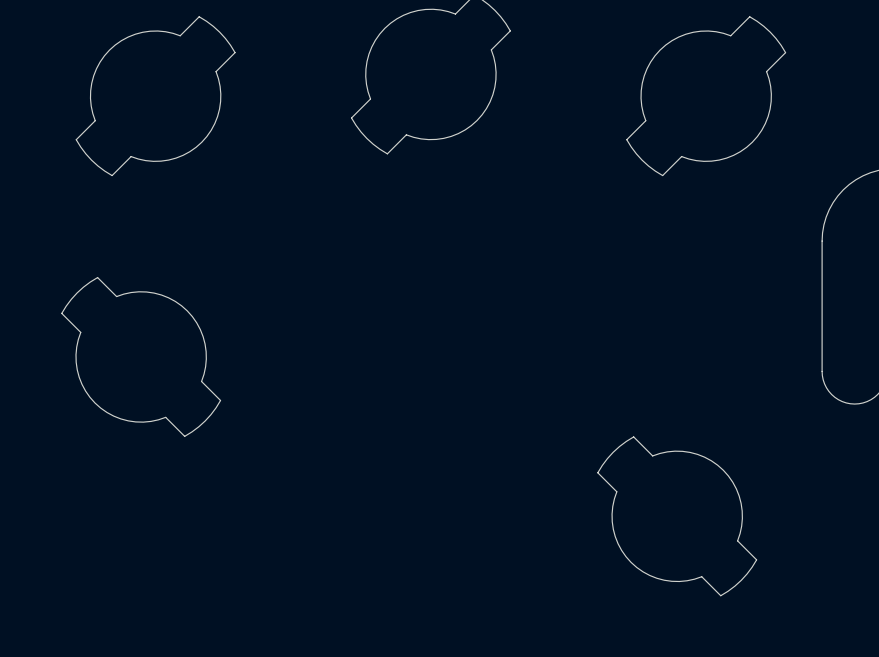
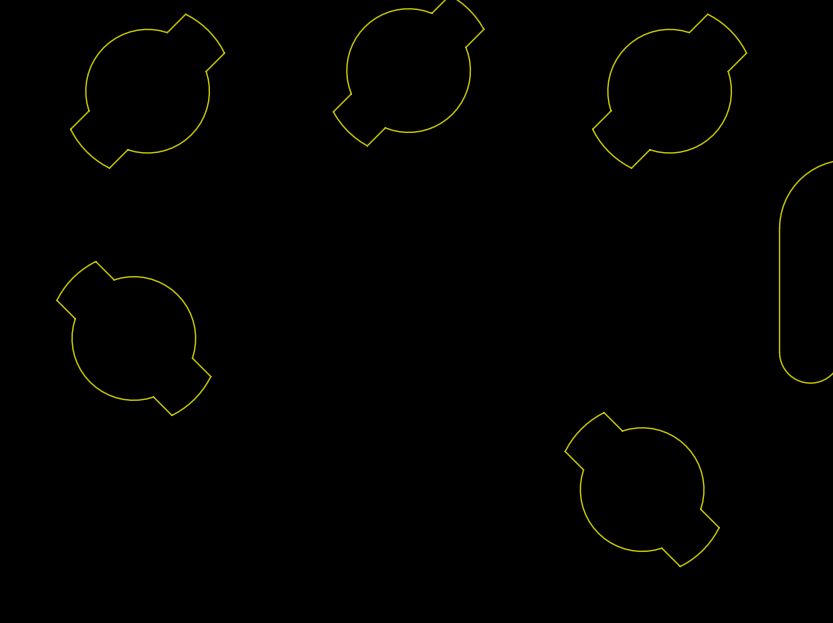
board edge: (199, 16) (180, 35) (157, 31) (142, 32) (128, 37) (115, 45) (100, 62) (93, 75) (90, 90) (91, 106) (95, 120) (76, 139) (91, 160) (112, 175) (131, 156) (145, 160) (161, 161) (183, 155) (201, 142) (211, 130) (217, 116) (220, 101) (220, 86) (216, 71) (235, 52) (219, 32) (199, 16) -> none
board edge: (749, 16) (730, 35) (716, 31) (700, 31) (678, 37) (665, 45) (650, 62) (644, 75) (641, 90) (641, 106) (645, 120) (626, 139) (642, 160) (662, 175) (681, 156) (703, 161) (719, 160) (733, 155) (746, 147) (761, 130) (768, 116) (771, 101) (770, 86) (766, 71) (785, 52) (770, 32) (749, 16) -> none
part: none -> (147, 91)
part: none -> (669, 91)
board edge: (97, 277) (116, 296) (131, 292) (146, 291) (168, 297) (181, 305) (196, 322) (203, 336) (206, 351) (205, 366) (201, 381) (220, 400) (205, 420) (184, 436) (165, 417) (151, 421) (135, 421) (113, 416) (95, 403) (85, 391) (79, 377) (76, 362) (76, 347) (80, 332) (61, 313) (77, 292) (97, 277) -> none
part: none -> (133, 338)
board edge: (633, 436) (652, 455) (674, 451) (690, 452) (704, 457) (717, 465) (732, 482) (739, 496) (742, 510) (741, 526) (737, 540) (756, 559) (741, 580) (720, 595) (701, 576) (679, 581) (664, 580) (649, 575) (631, 562) (621, 550) (615, 536) (612, 521) (612, 506) (616, 491) (597, 472) (613, 452) (633, 436) -> none
part: none -> (642, 489)

